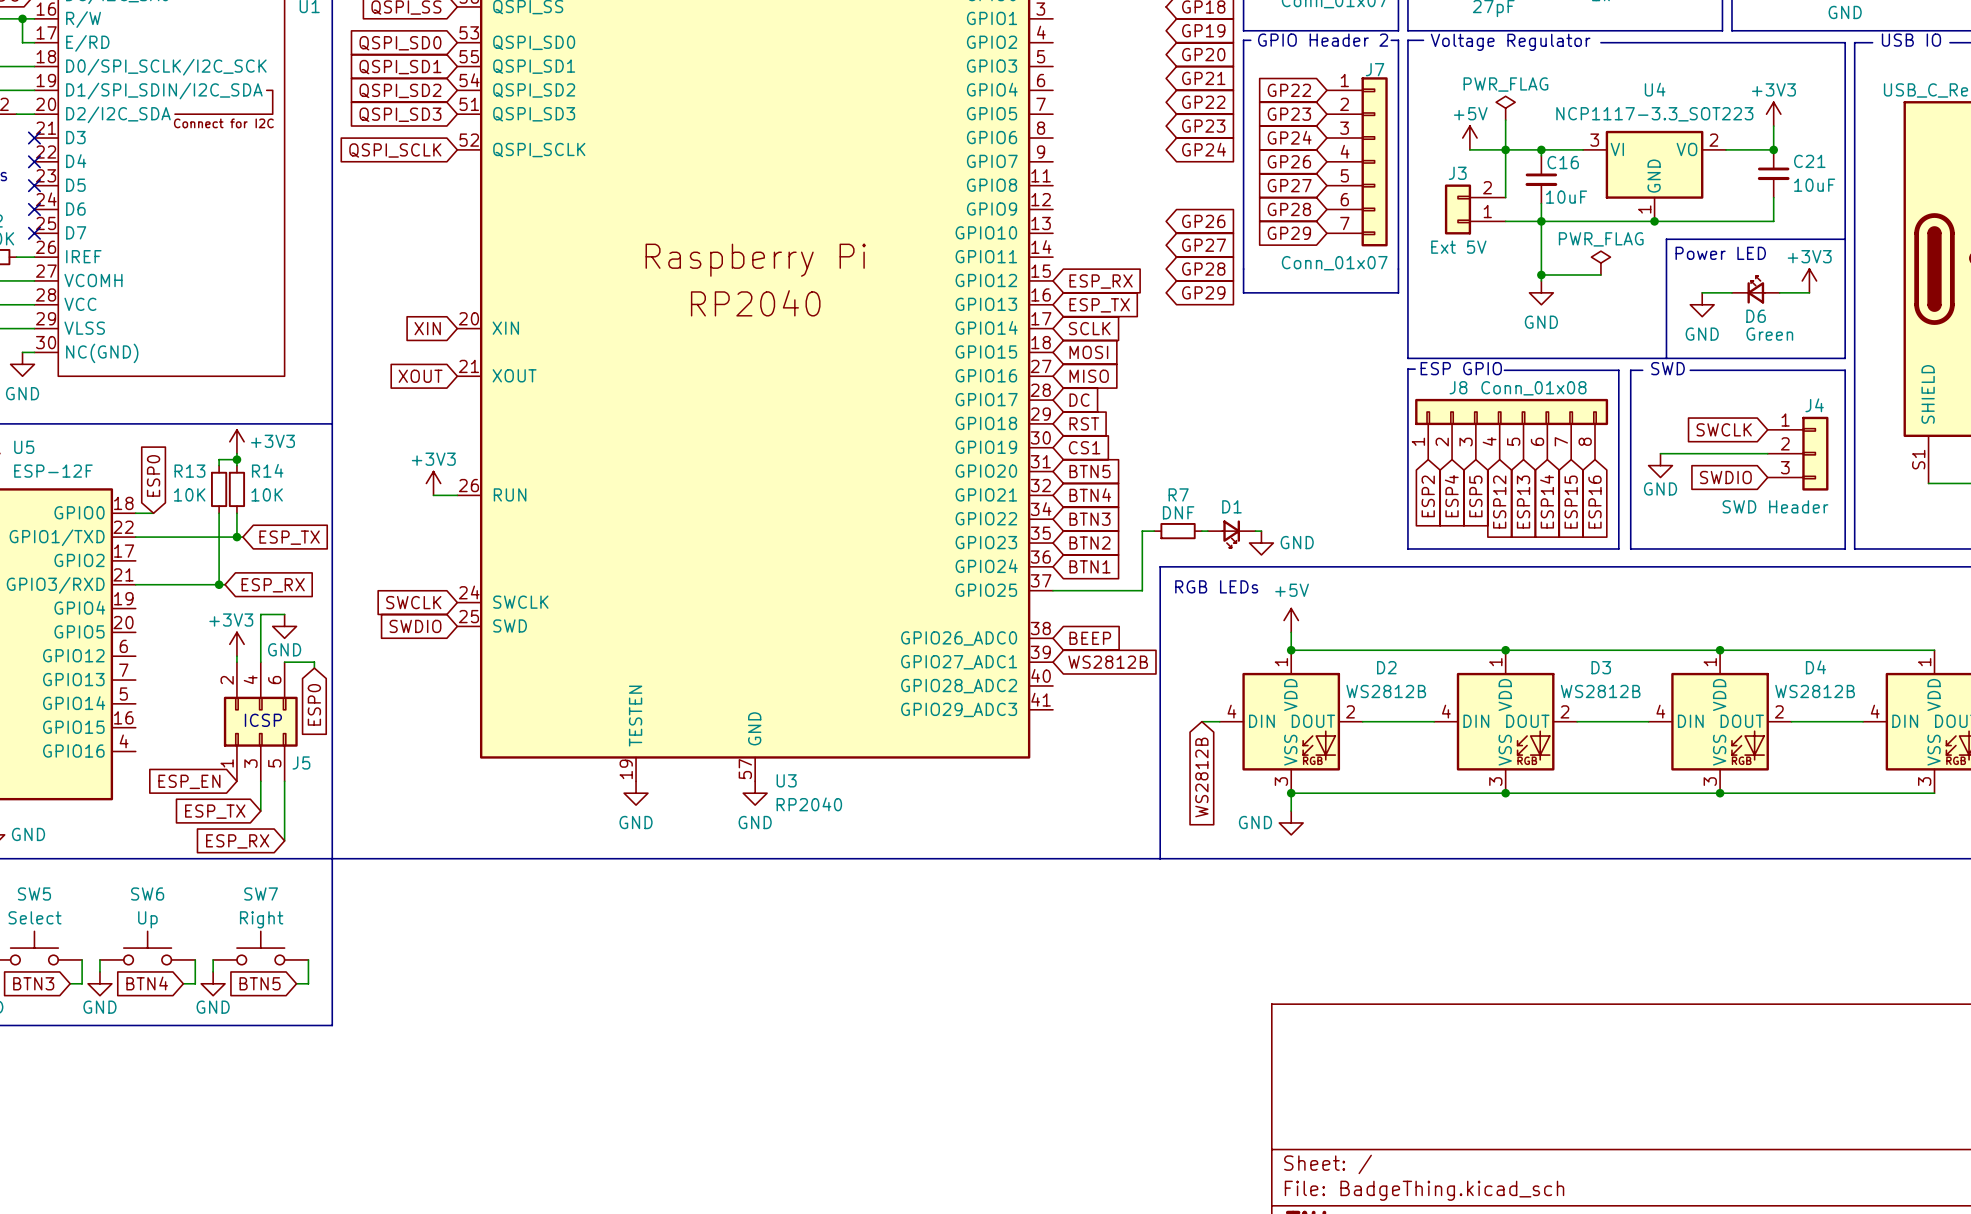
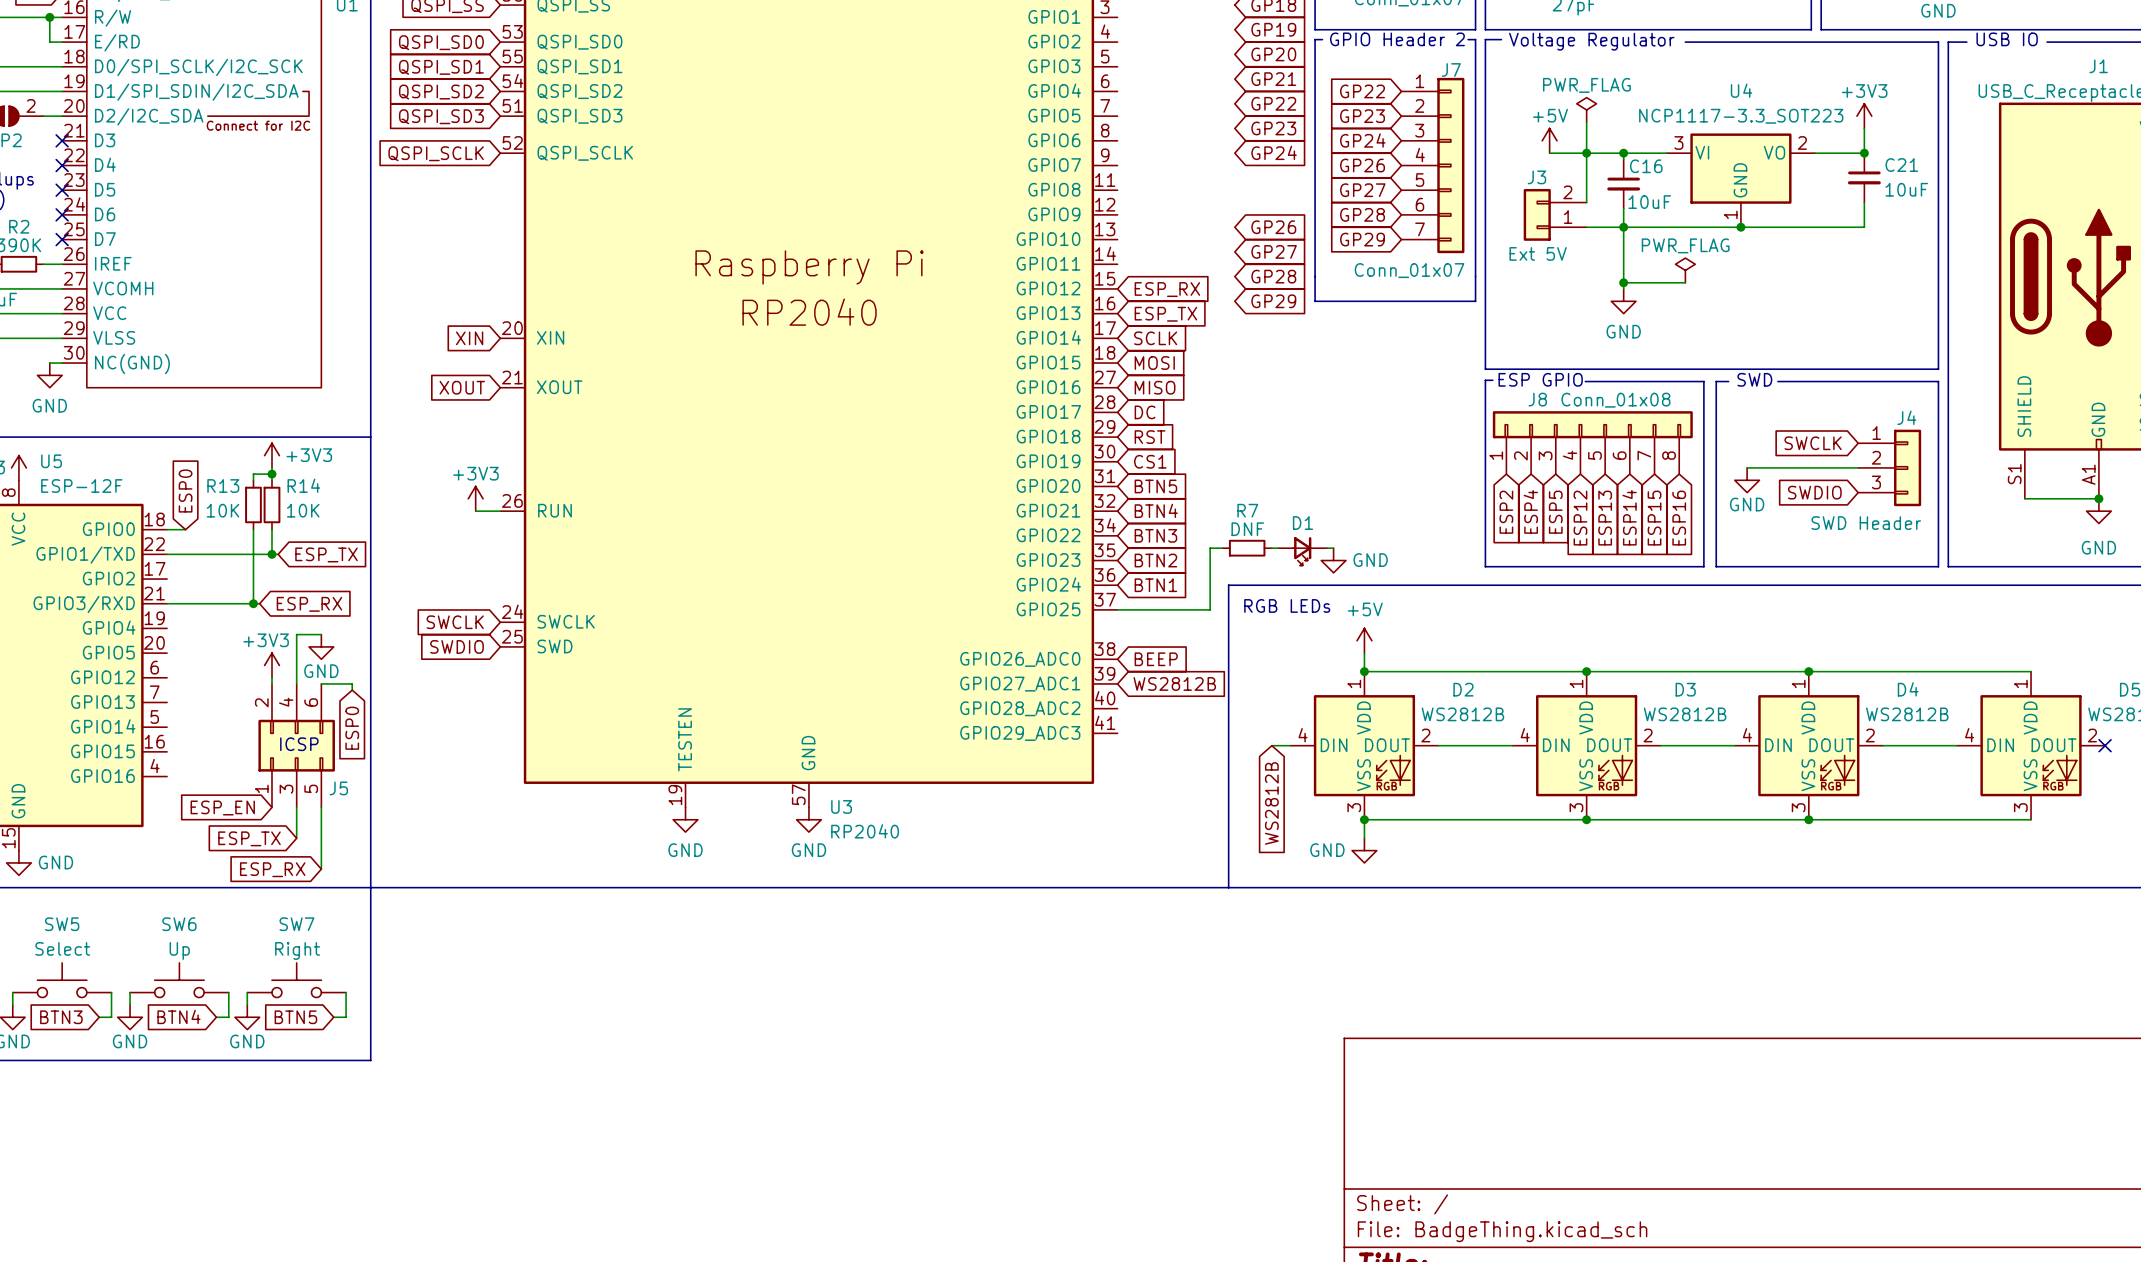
line: (1845, 239) (1666, 239) (1666, 358) -> none
text: Power LED (1720, 253) -> none
power symbol: +3V3 (1809, 280) -> none
D6: Green (1755, 289) -> none
wire: (1702, 292) (1731, 292) -> none
wire: (1779, 292) (1809, 292) -> none
power symbol: GND (1702, 304) -> none

